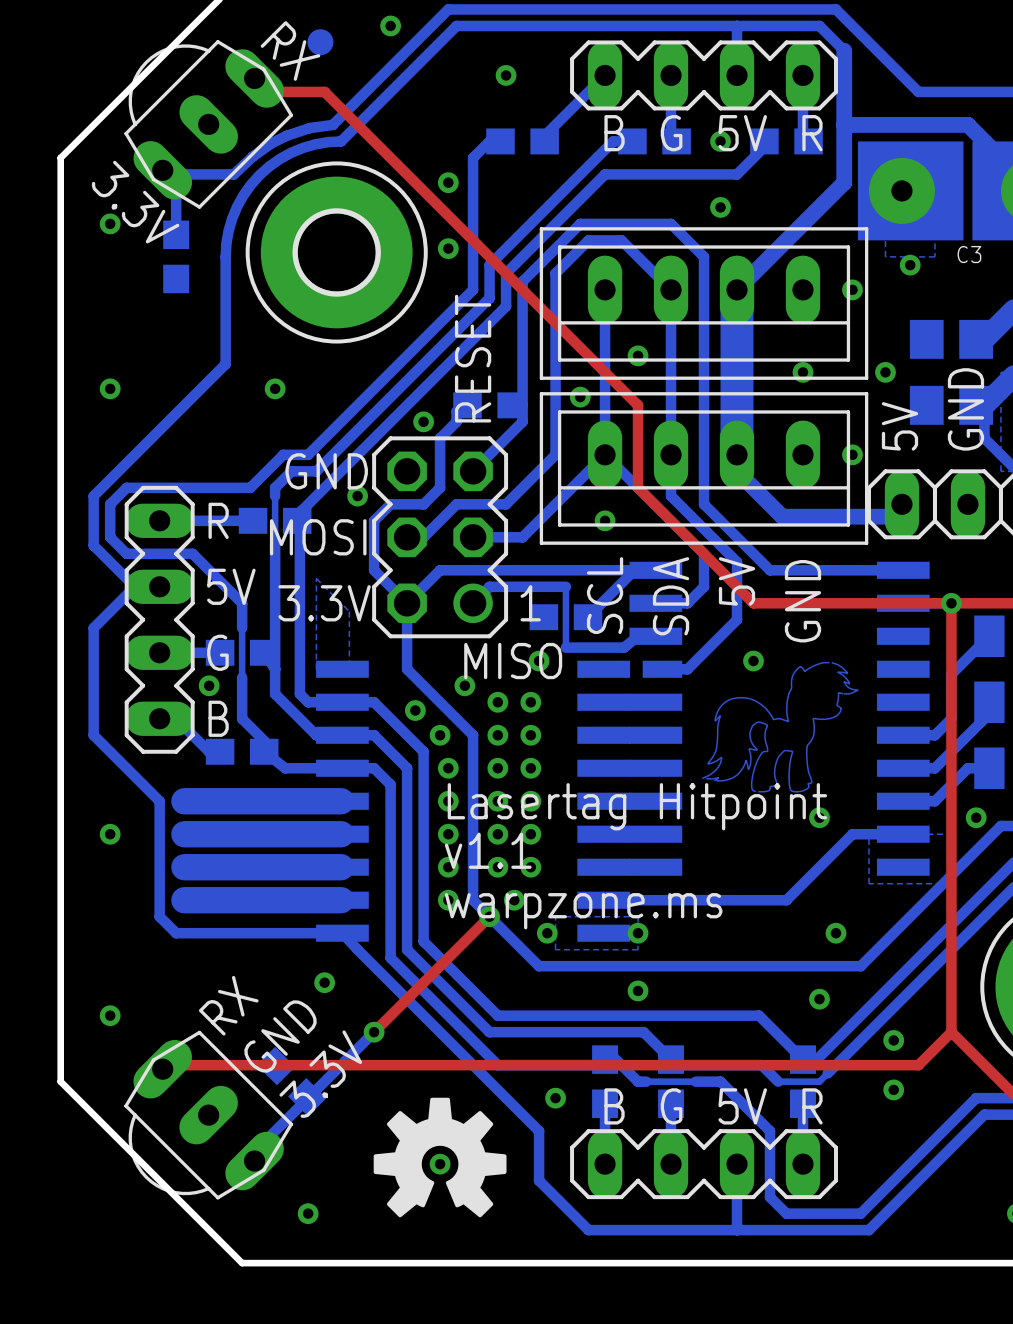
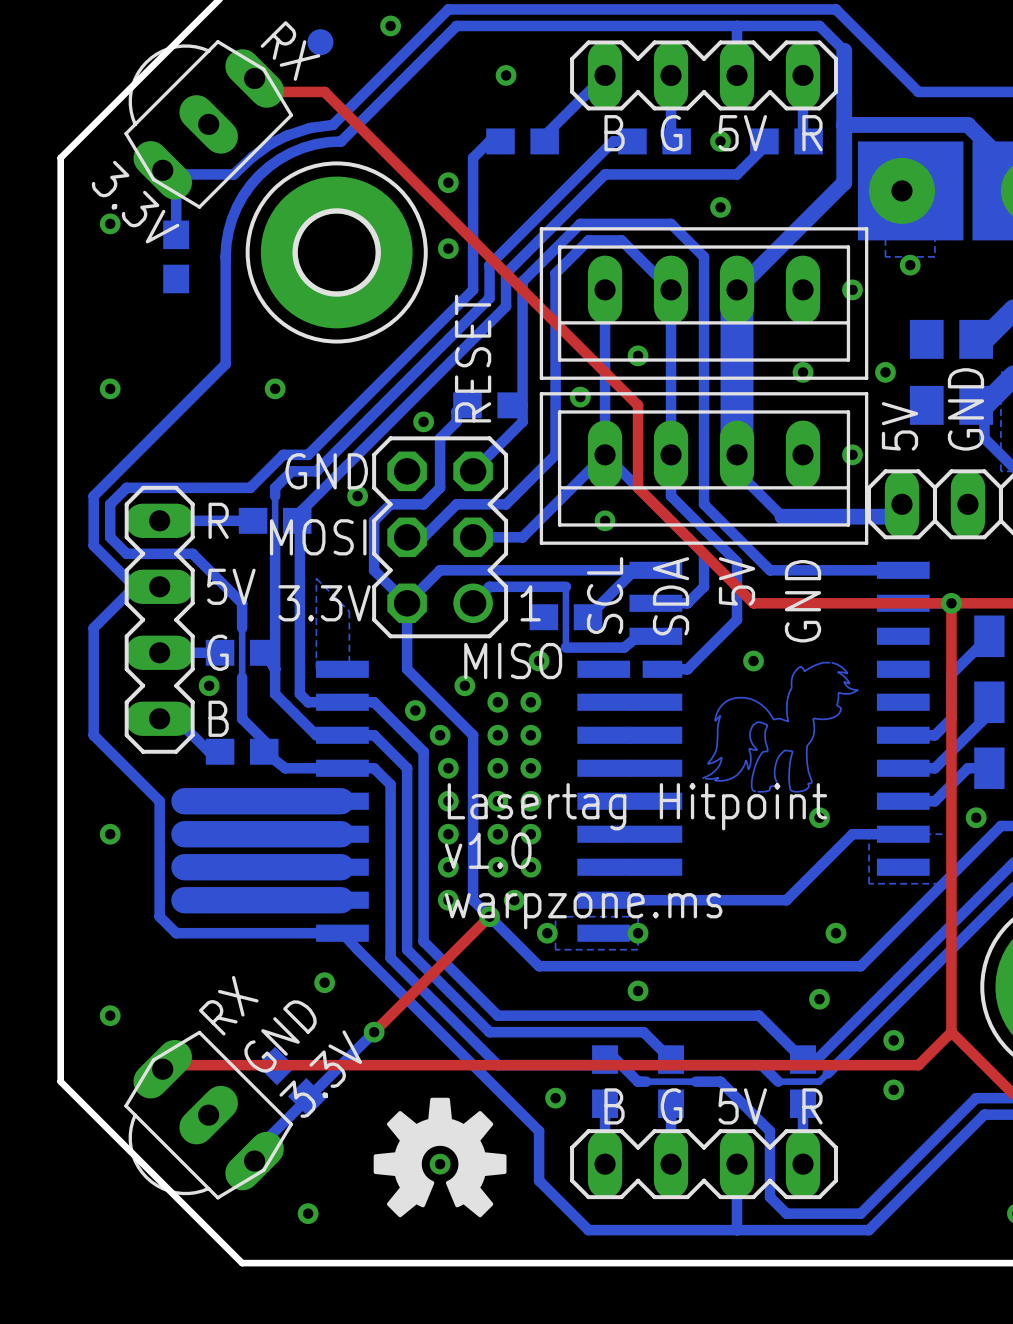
C3 name: C3 (969, 254) -> none
bottom track width: thick (737, 454) (737, 471) (782, 516) -> thin (737, 454) (737, 471) (782, 516)
text: v1.1 (488, 850) -> v1.0 (488, 850)

